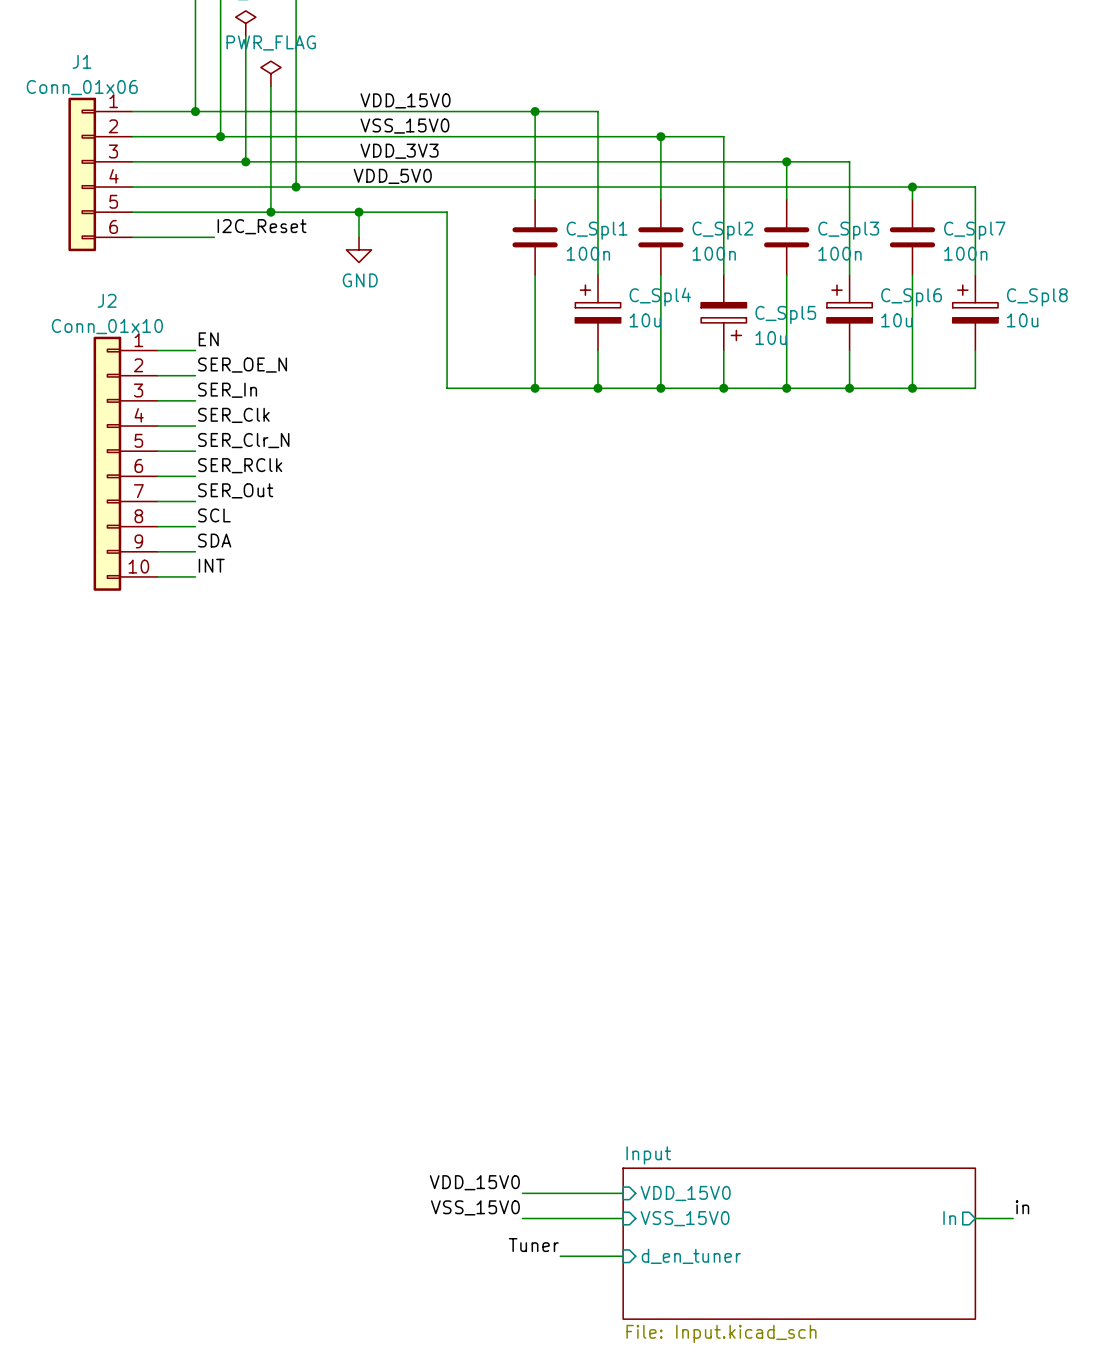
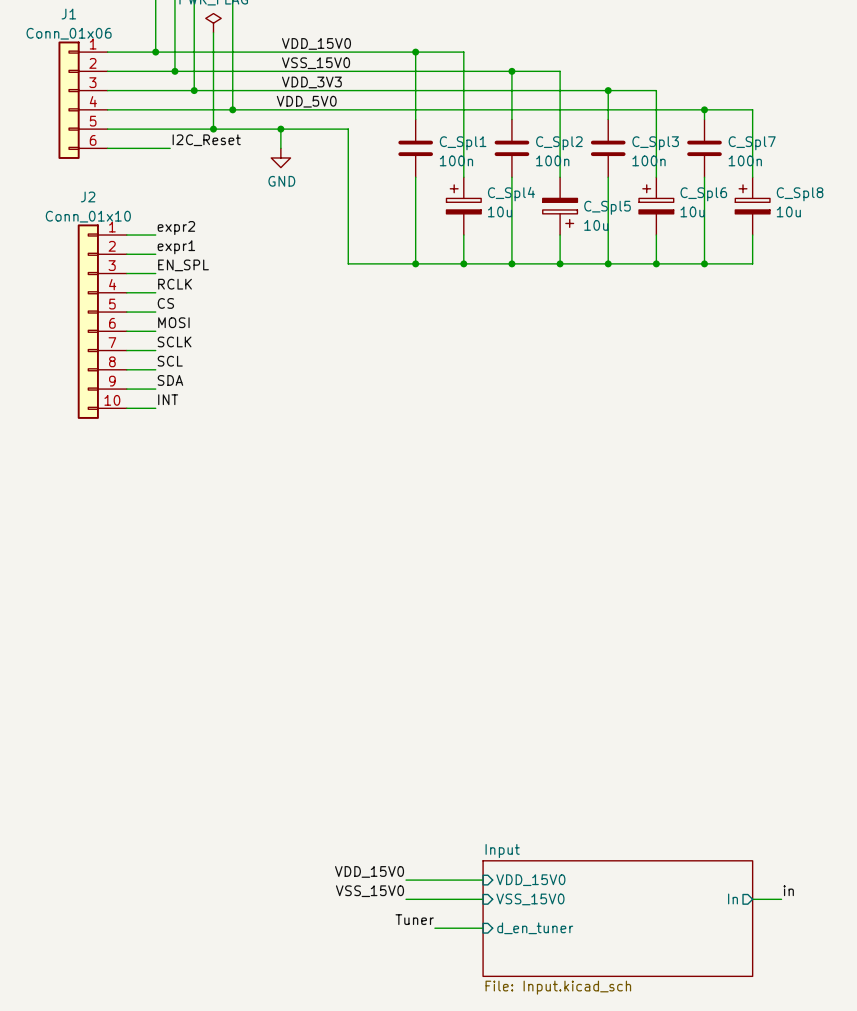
label: EN (208, 339) -> expr2 (176, 228)
label: SER_OE_N (242, 365) -> expr1 (176, 247)
label: SER_In (227, 390) -> EN_SPL (183, 265)
label: SER_Clk (233, 415) -> RCLK (175, 284)
label: SER_Clr_N (243, 440) -> CS (165, 303)
label: SER_RClk (240, 465) -> MOSI (173, 322)
label: SER_Out (235, 490) -> SCLK (174, 341)

